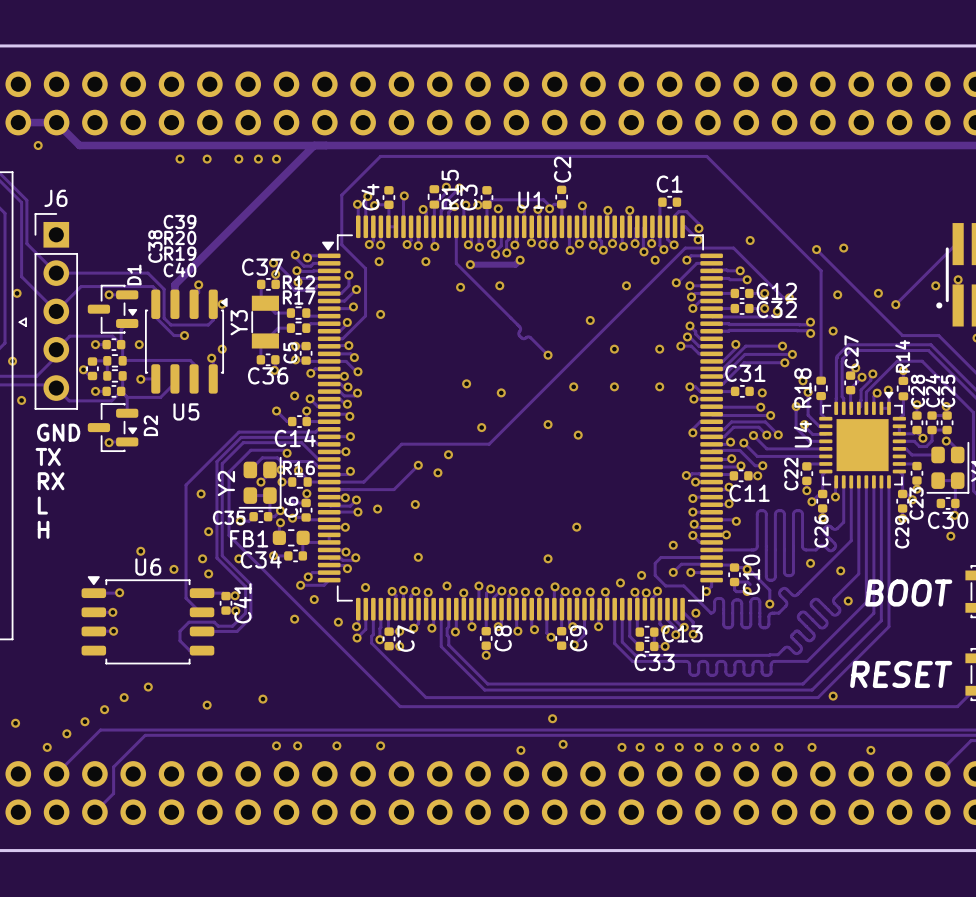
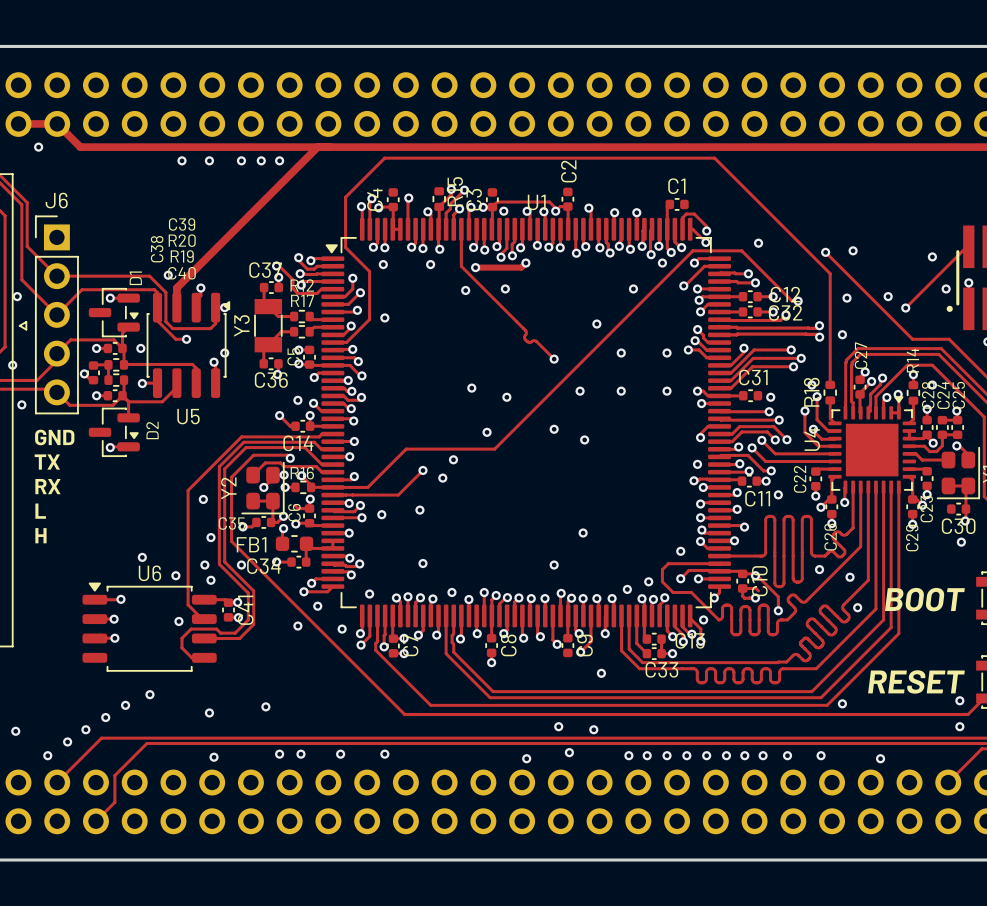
via: none -> (932, 256)
via: none -> (168, 275)
via: none -> (932, 385)
via: none -> (697, 464)
via: none -> (778, 494)
via: none -> (178, 621)
via: none -> (601, 673)
via: none -> (959, 700)
via: none -> (959, 726)
via: none -> (593, 729)
via: none -> (214, 757)

